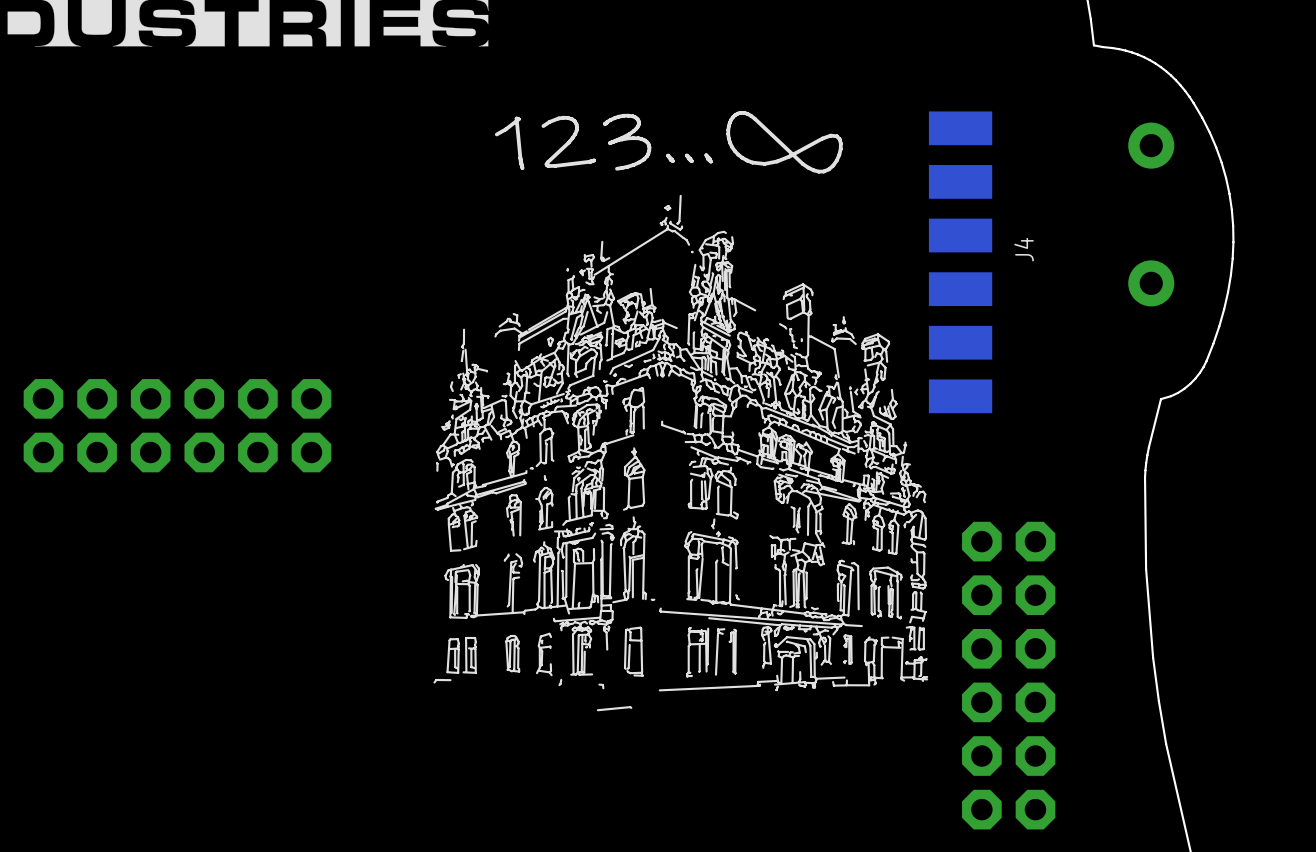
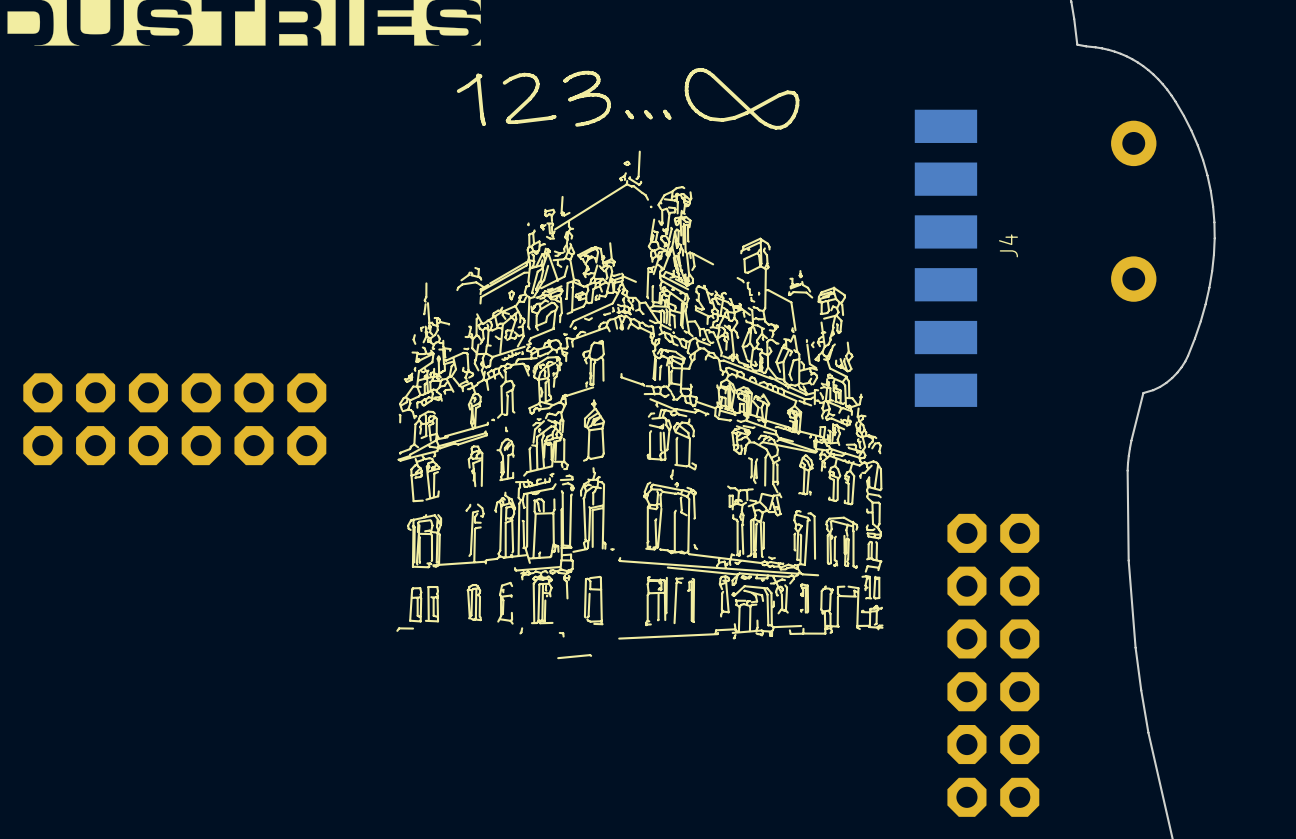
drawing position: (680, 411) -> (639, 363)

